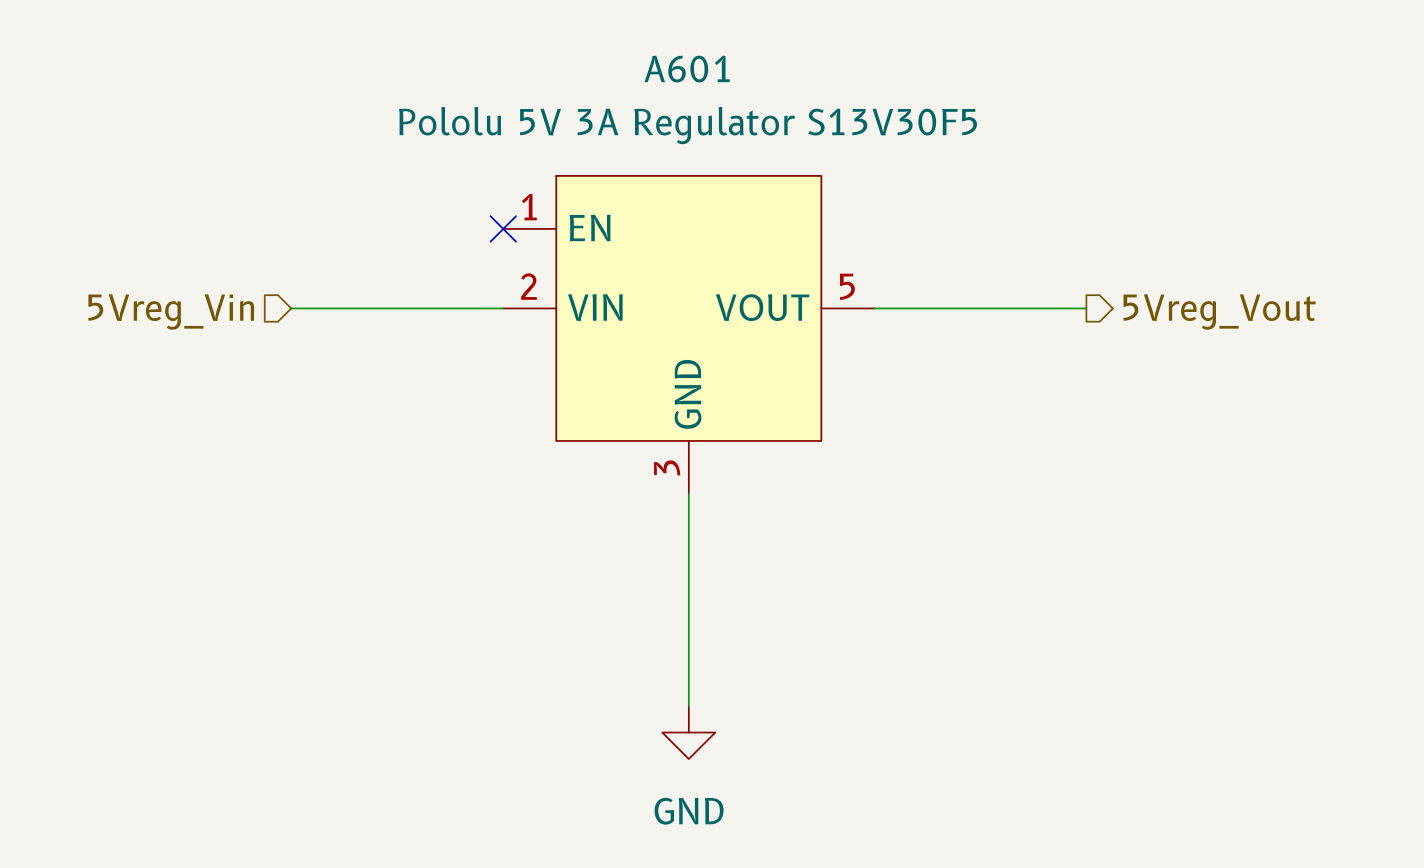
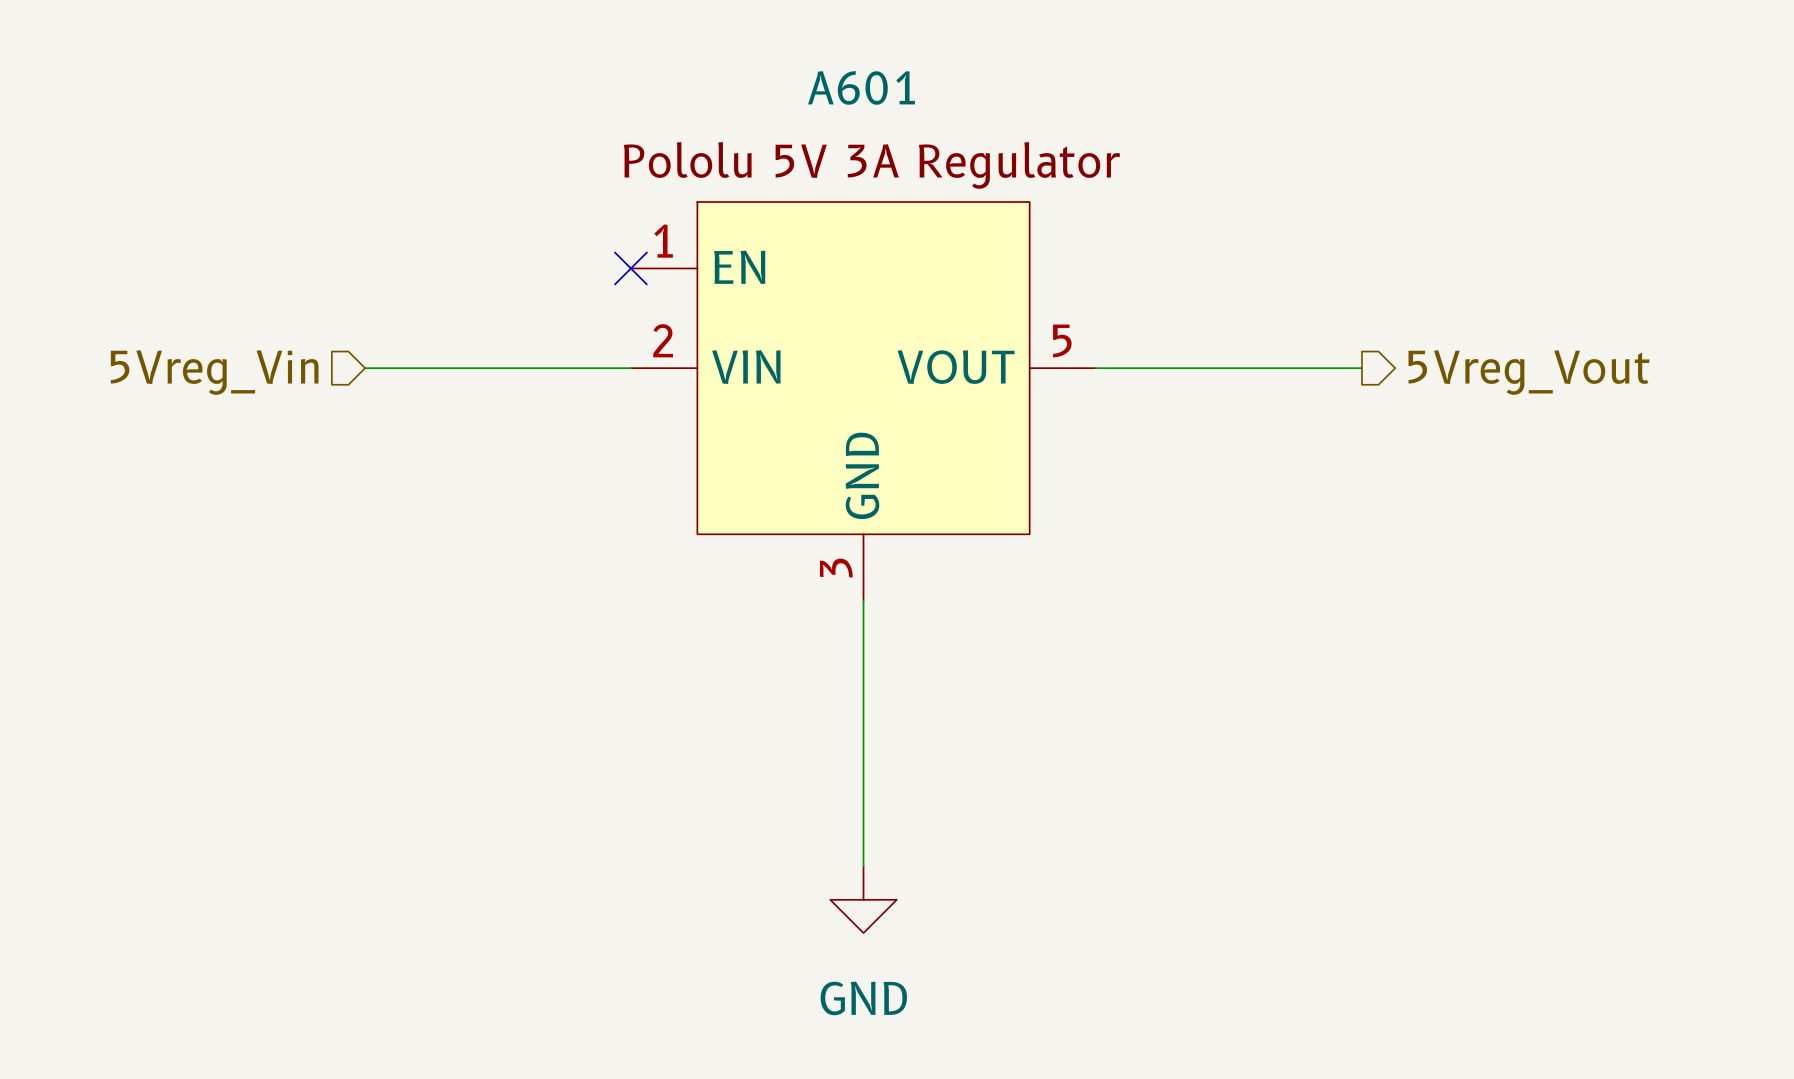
A601 name position: A601 (687, 69) -> A601 (861, 87)
A601 value: Pololu 5V 3A Regulator S13V30F5 (687, 125) -> none
A601 text: none -> Pololu 5V 3A Regulator (871, 165)

